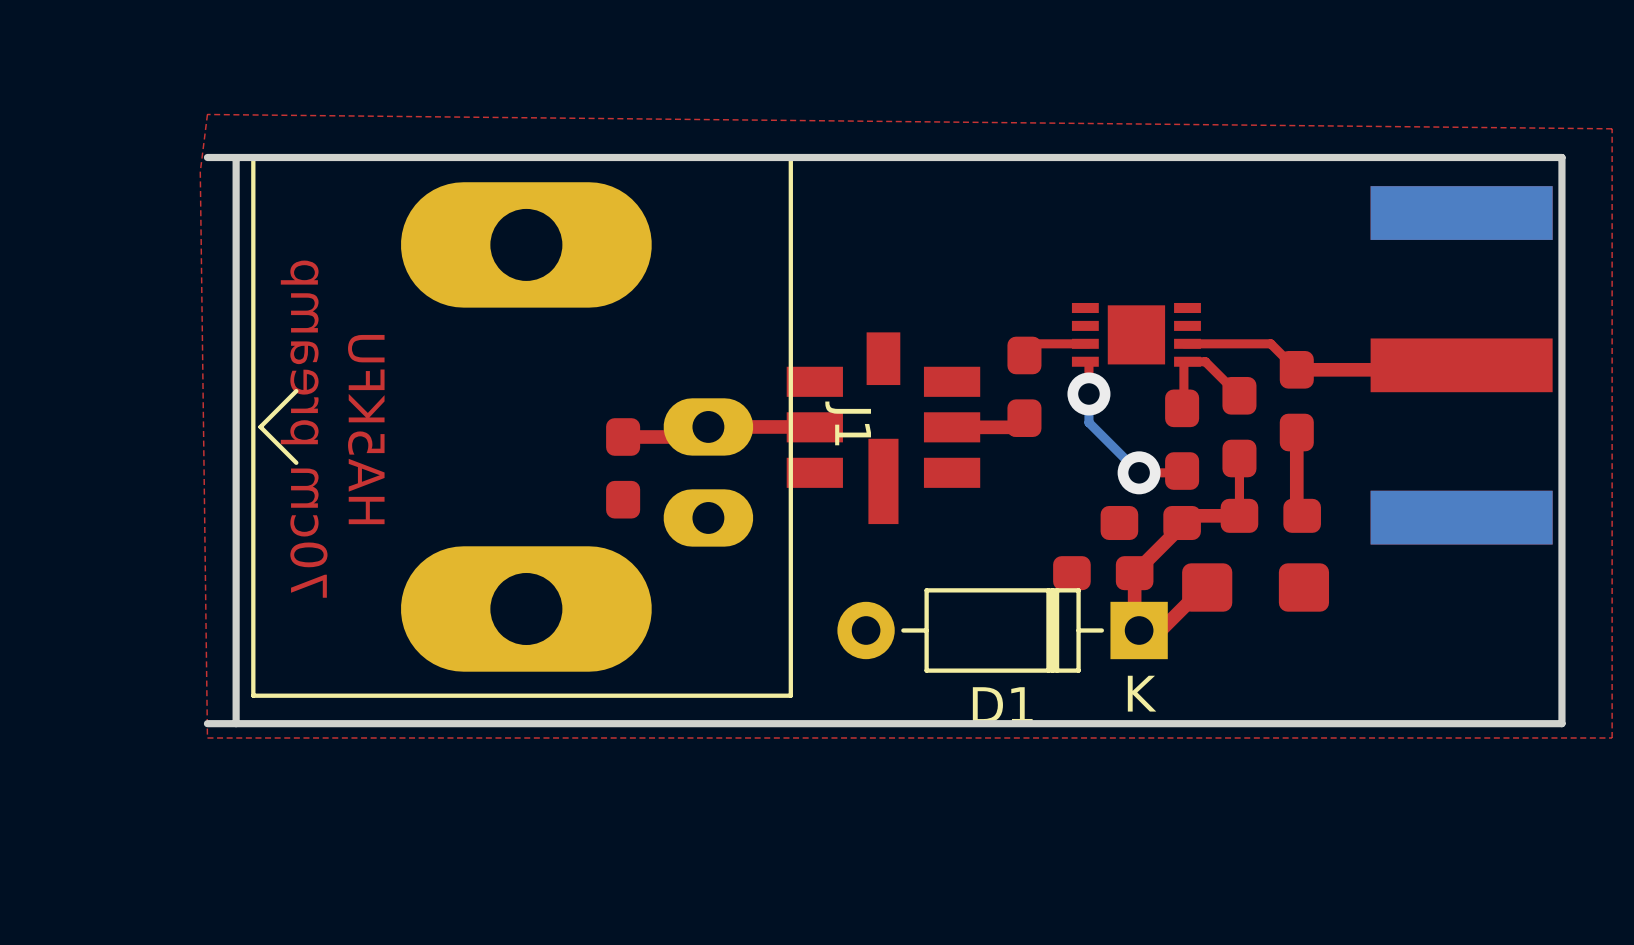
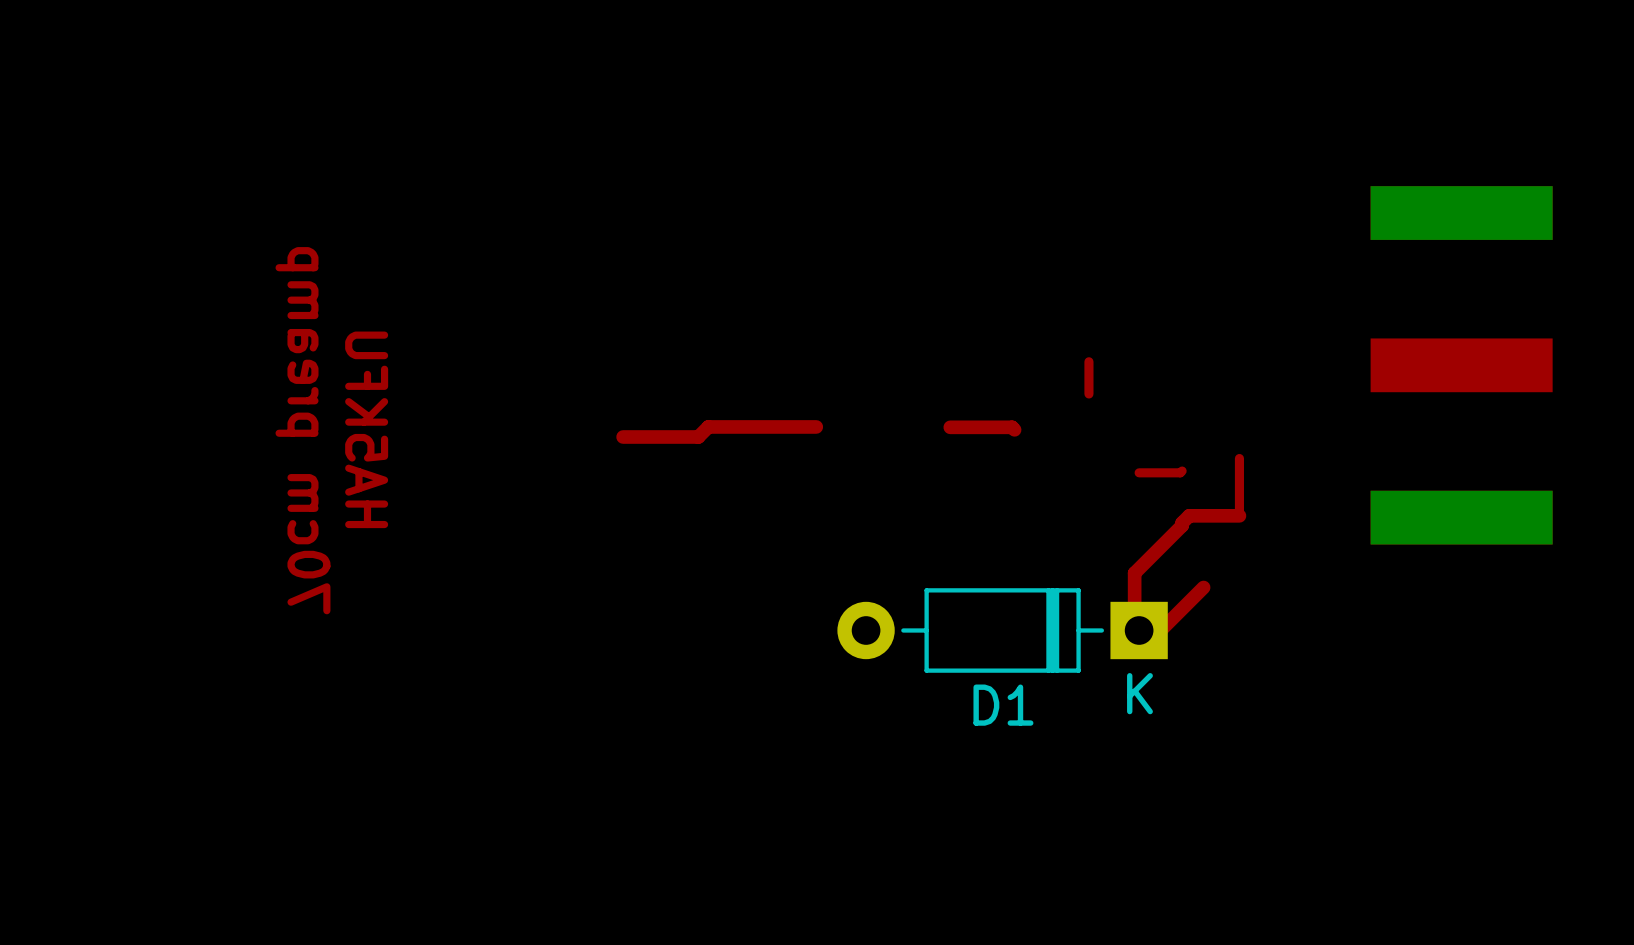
top zone outline: (207, 114) (1612, 128) (1612, 737) (207, 737) (200, 171) (207, 114) -> none
board edge: (207, 157) (1561, 157) (1561, 723) (207, 723) -> none
board edge: (236, 157) (236, 723) -> none
part: (1136, 334) -> none
top track: (1088, 343) (1036, 343) (1024, 355) -> none
top track: (1183, 343) (1270, 343) (1296, 369) (1457, 369) (1461, 365) -> none
part: (1024, 386) -> none
bottom track: (1088, 393) (1088, 422) (1139, 472) -> none
via: (1088, 393) -> none
top track: (1239, 395) (1205, 361) (1183, 361) (1183, 406) (1182, 408) -> none
part: (1296, 401) -> none
J1: (522, 426) -> none
part: (1239, 427) -> none
part: (883, 428) -> none
top track: (1296, 432) (1296, 510) (1302, 515) -> none
part: (1182, 439) -> none
part: (623, 468) -> none
via: (1139, 472) -> none
part: (1270, 515) -> none
part: (1150, 522) -> none
part: (1103, 573) -> none
part: (1255, 587) -> none

